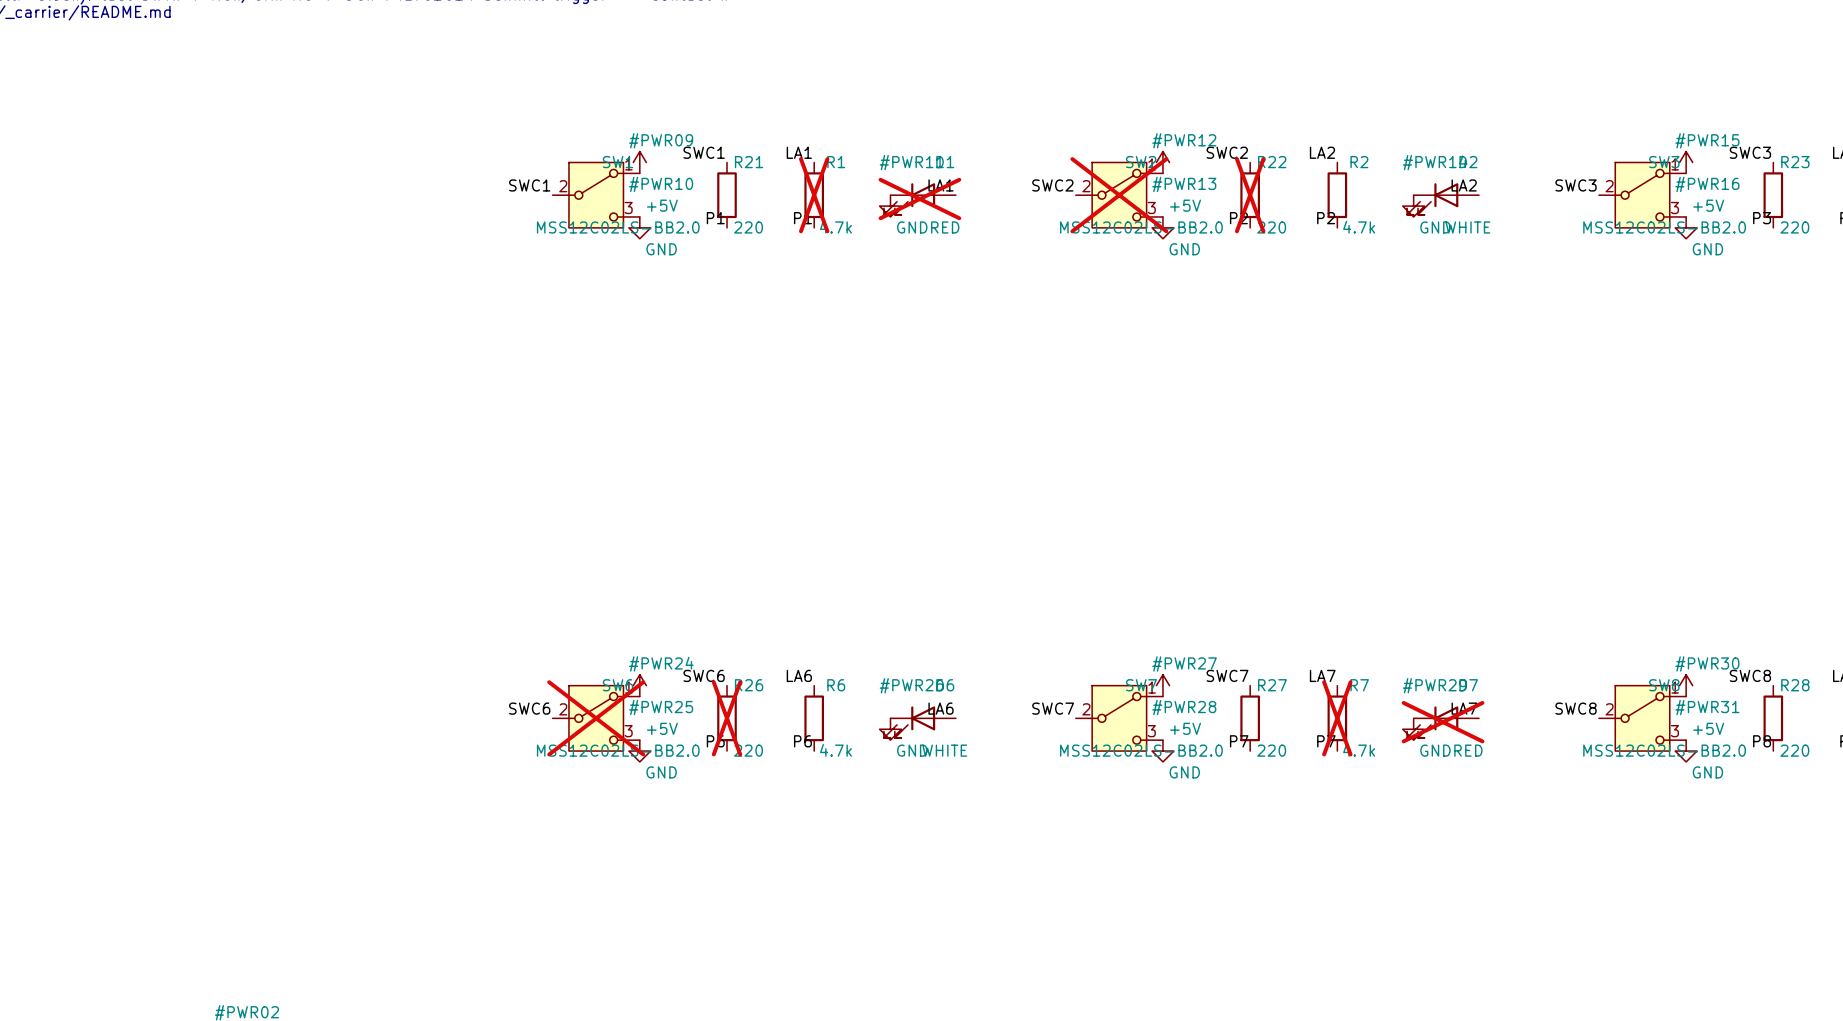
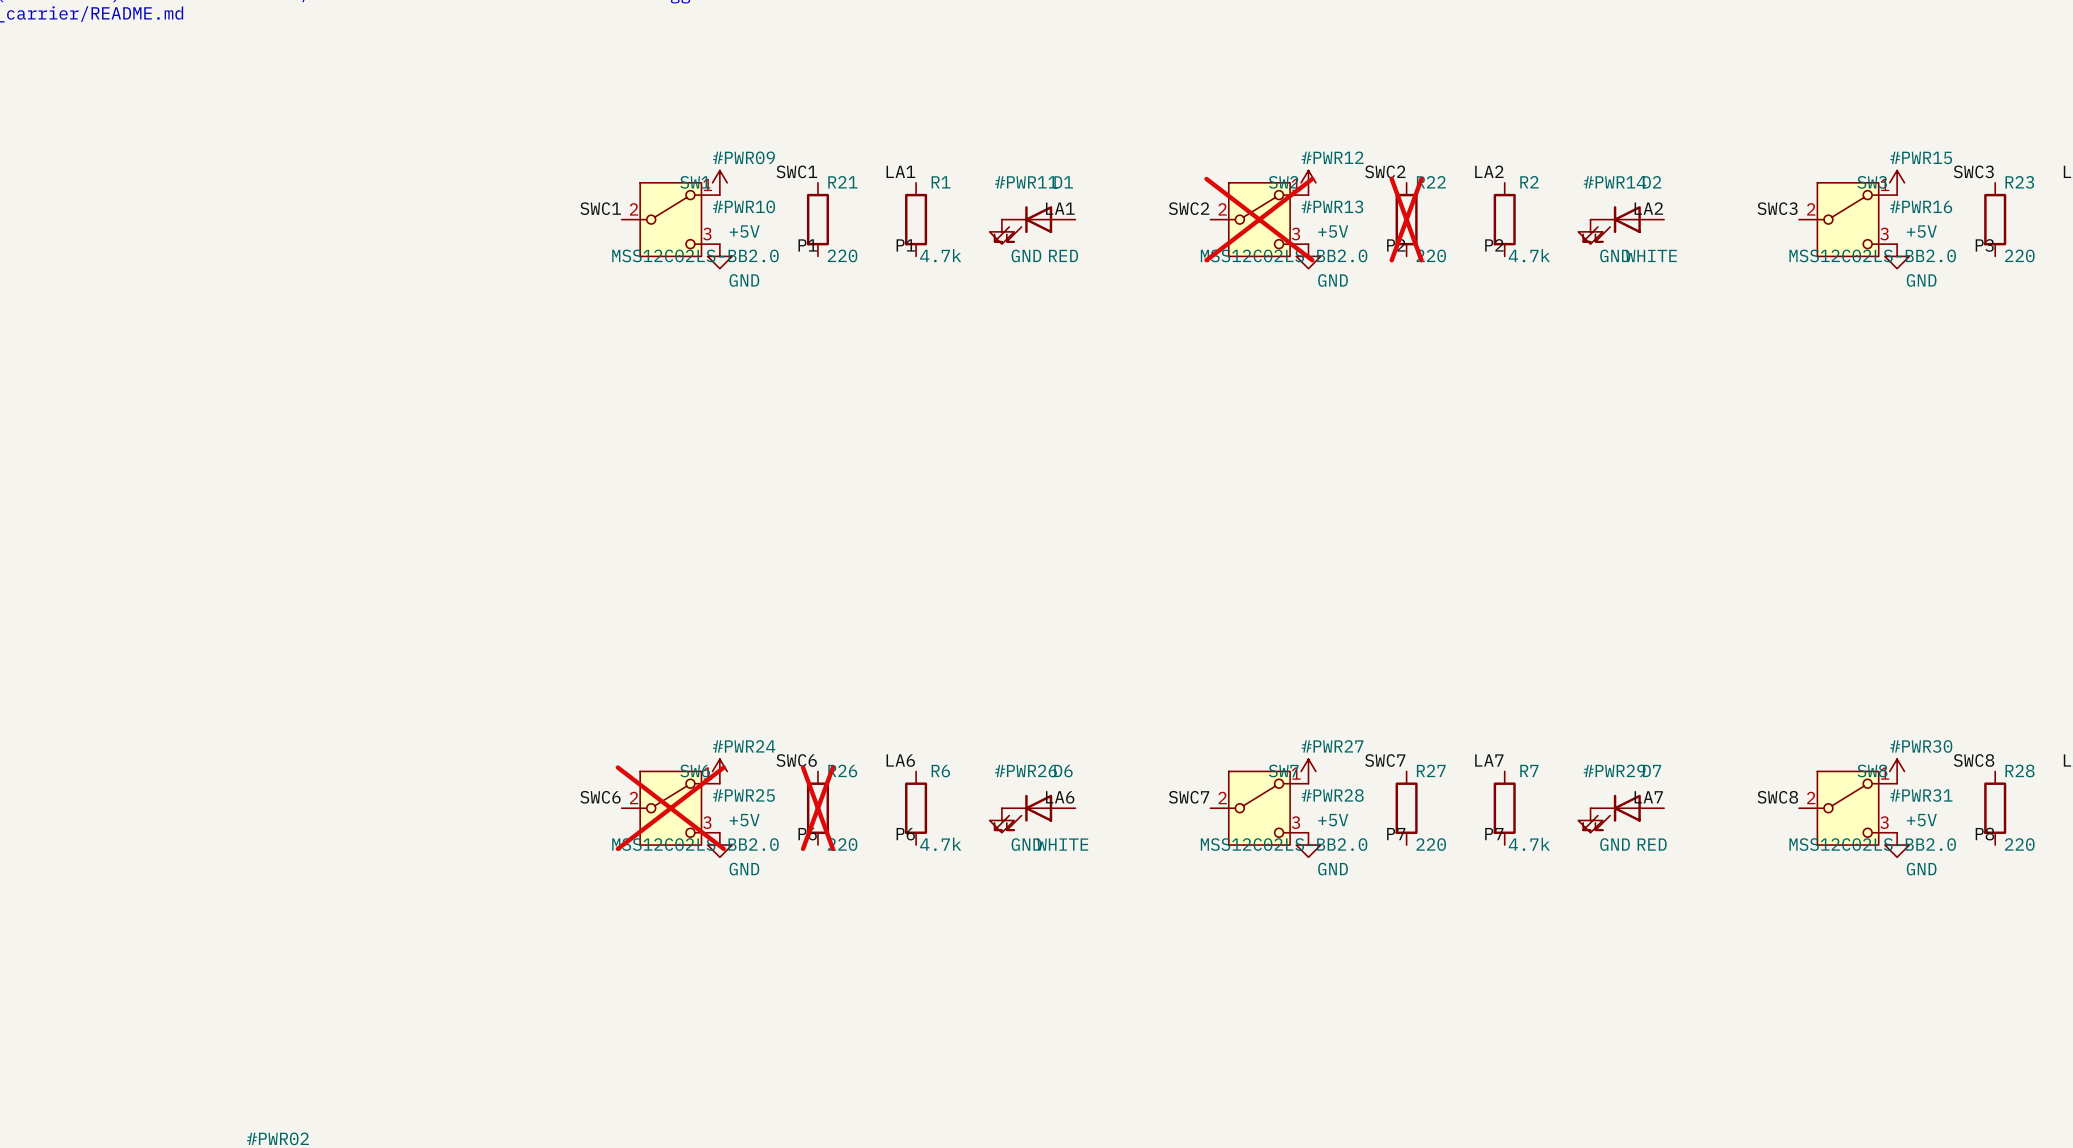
R1 do-not-place cross: (814, 195) -> none
D1 do-not-place cross: (919, 199) -> none
R7 do-not-place cross: (1337, 718) -> none
D7 do-not-place cross: (1443, 722) -> none

